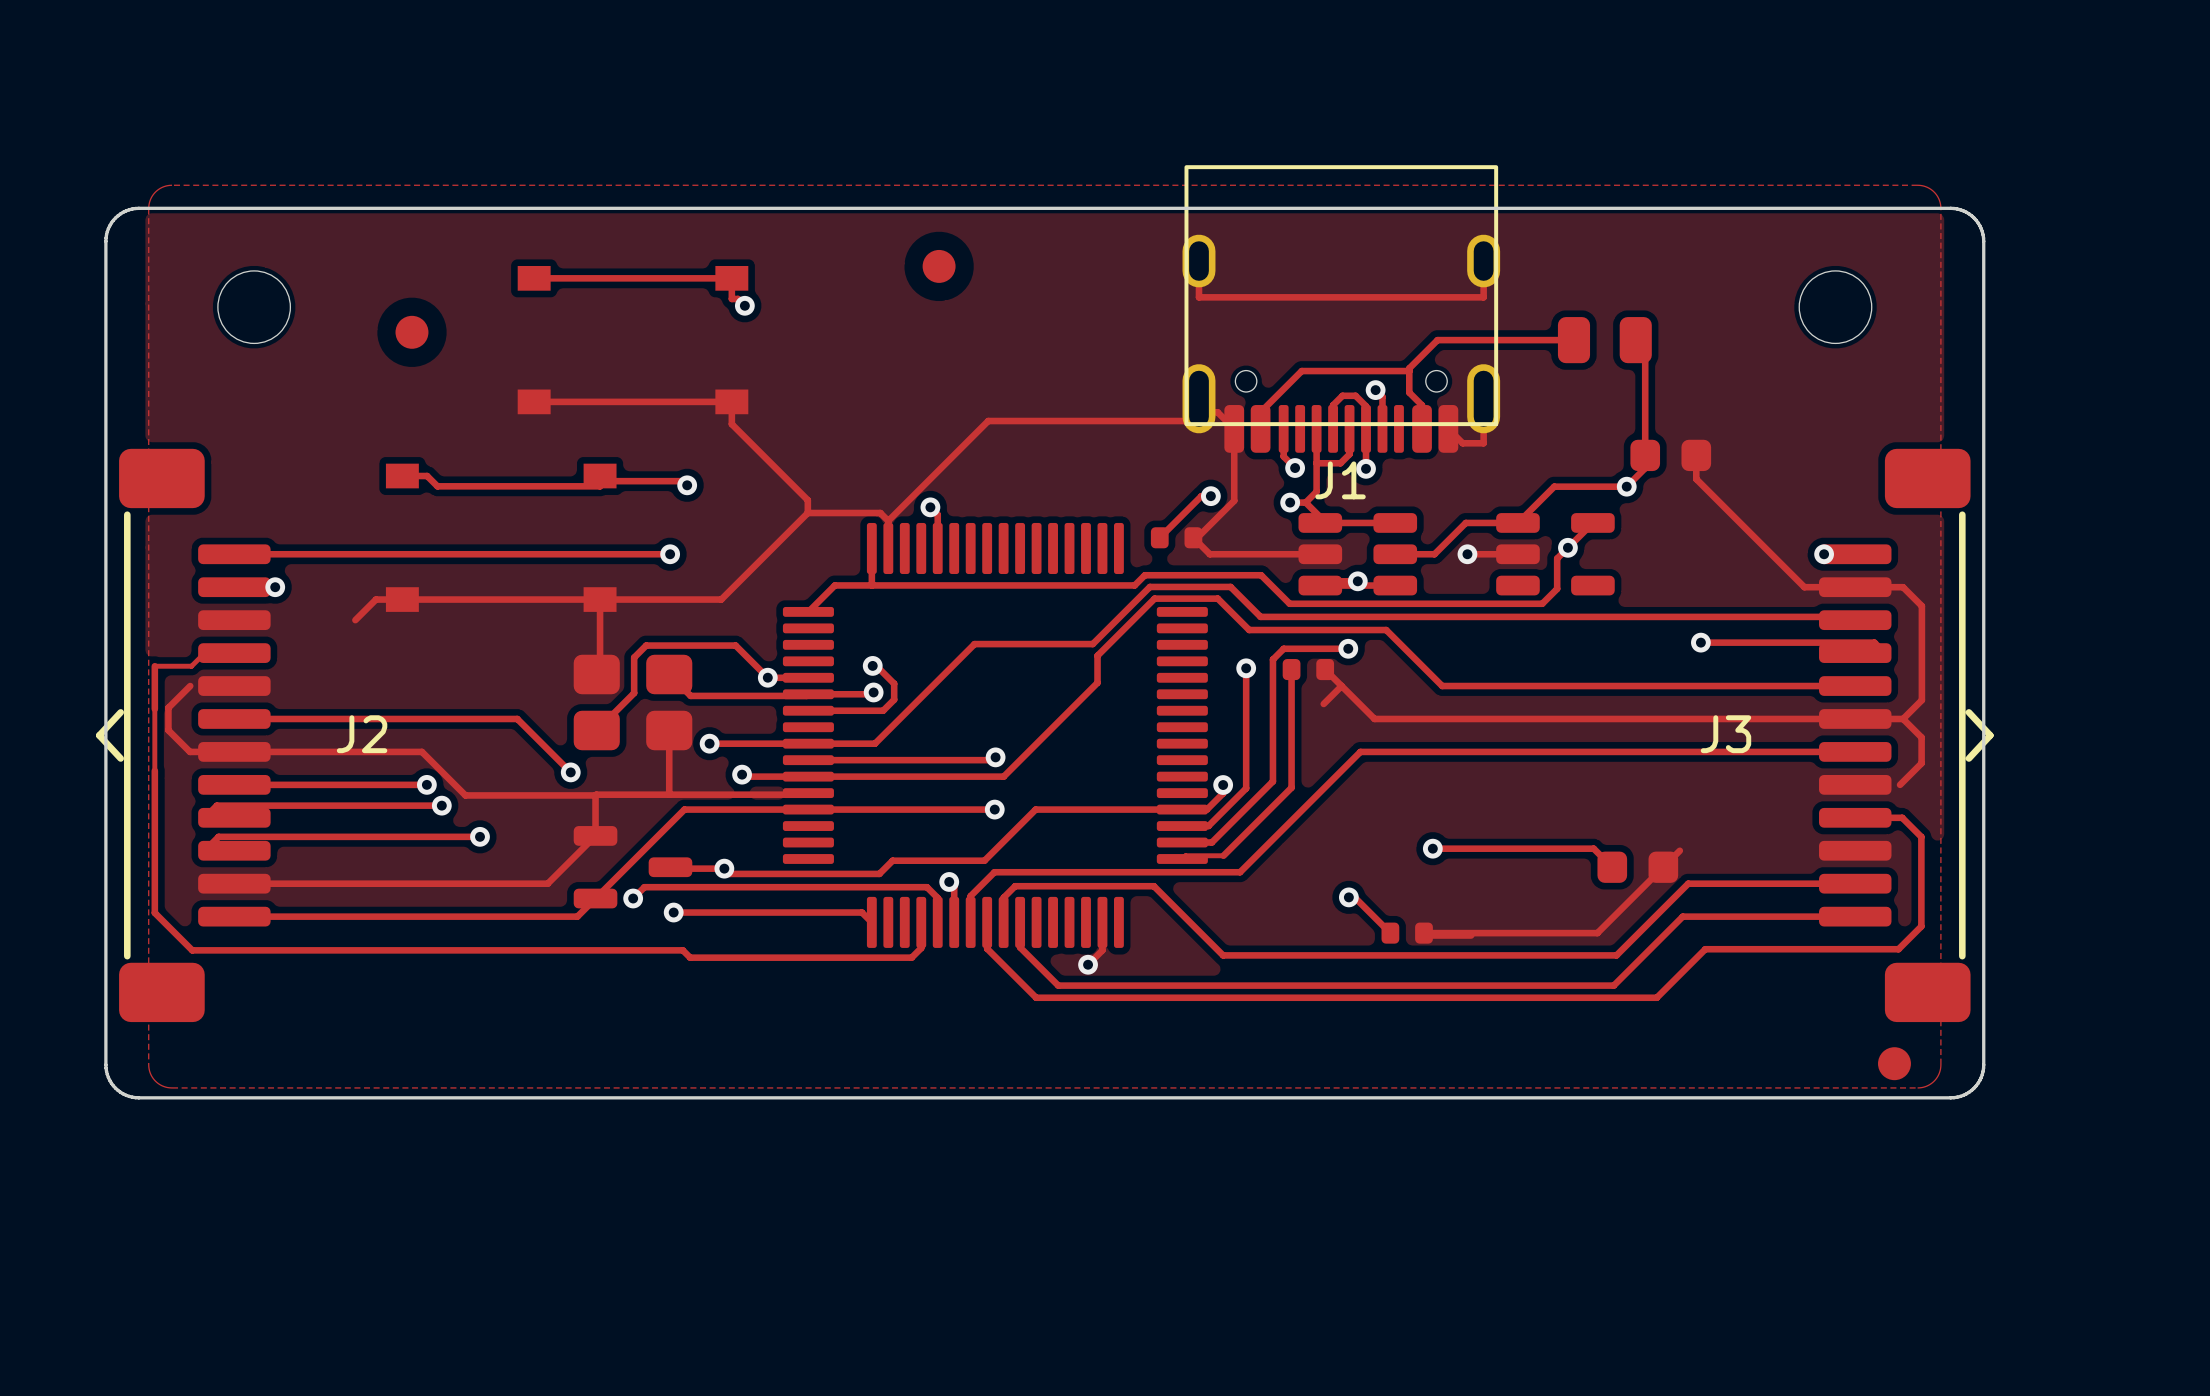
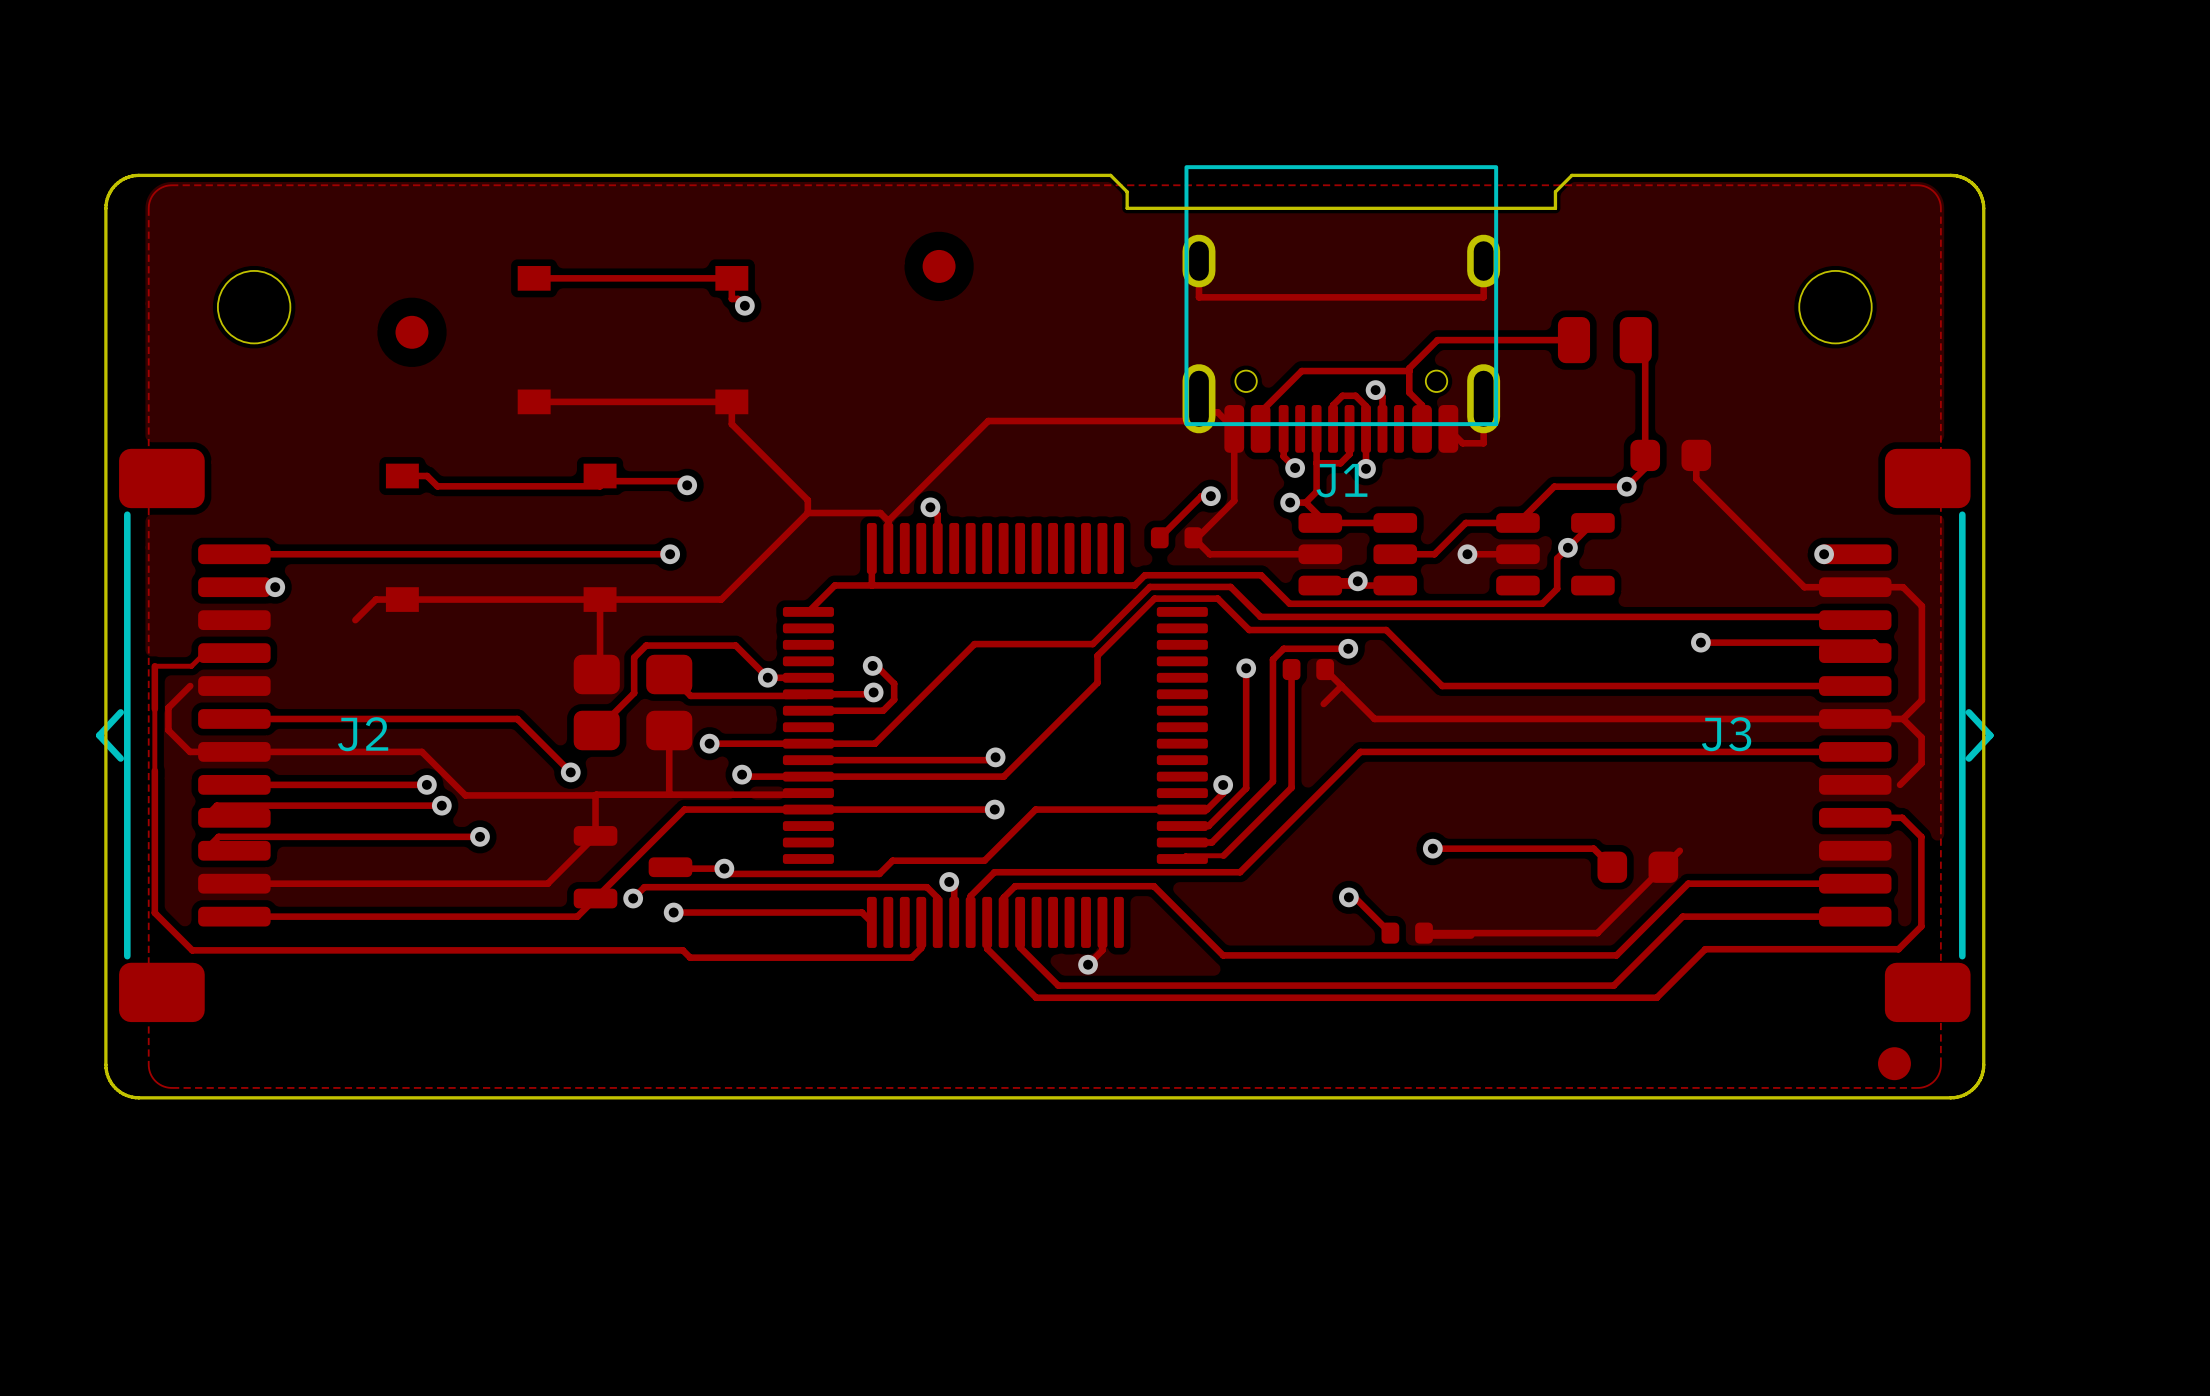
board edge: (1127, 208) (138, 208) (126, 210) (115, 217) (108, 228) (105, 241) -> (1127, 208) (1127, 191) (1110, 175) (138, 175) (123, 179) (109, 192) (106, 205) (105, 241)
board edge: (1555, 208) (1954, 208) (1966, 212) (1976, 220) (1981, 228) (1983, 241) -> (1555, 208) (1555, 191) (1571, 175) (1954, 175) (1971, 182) (1981, 195) (1983, 205) (1983, 241)

